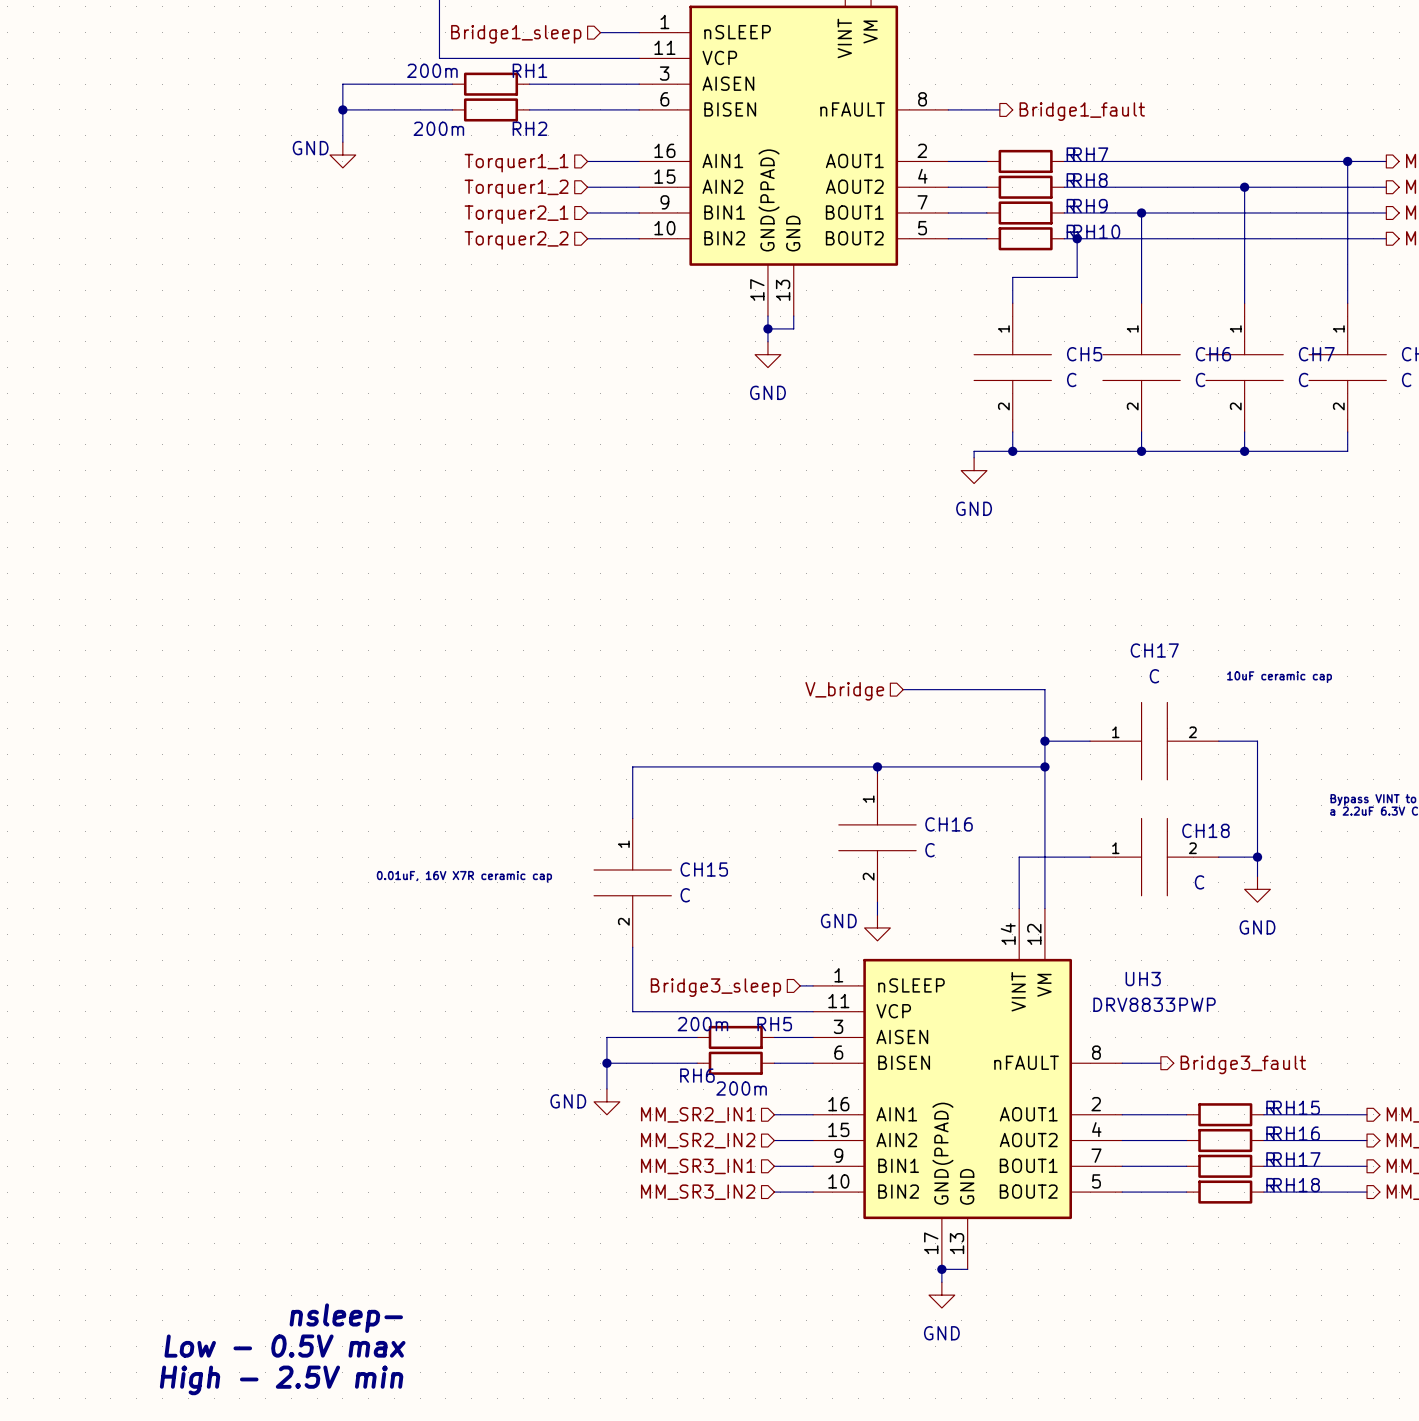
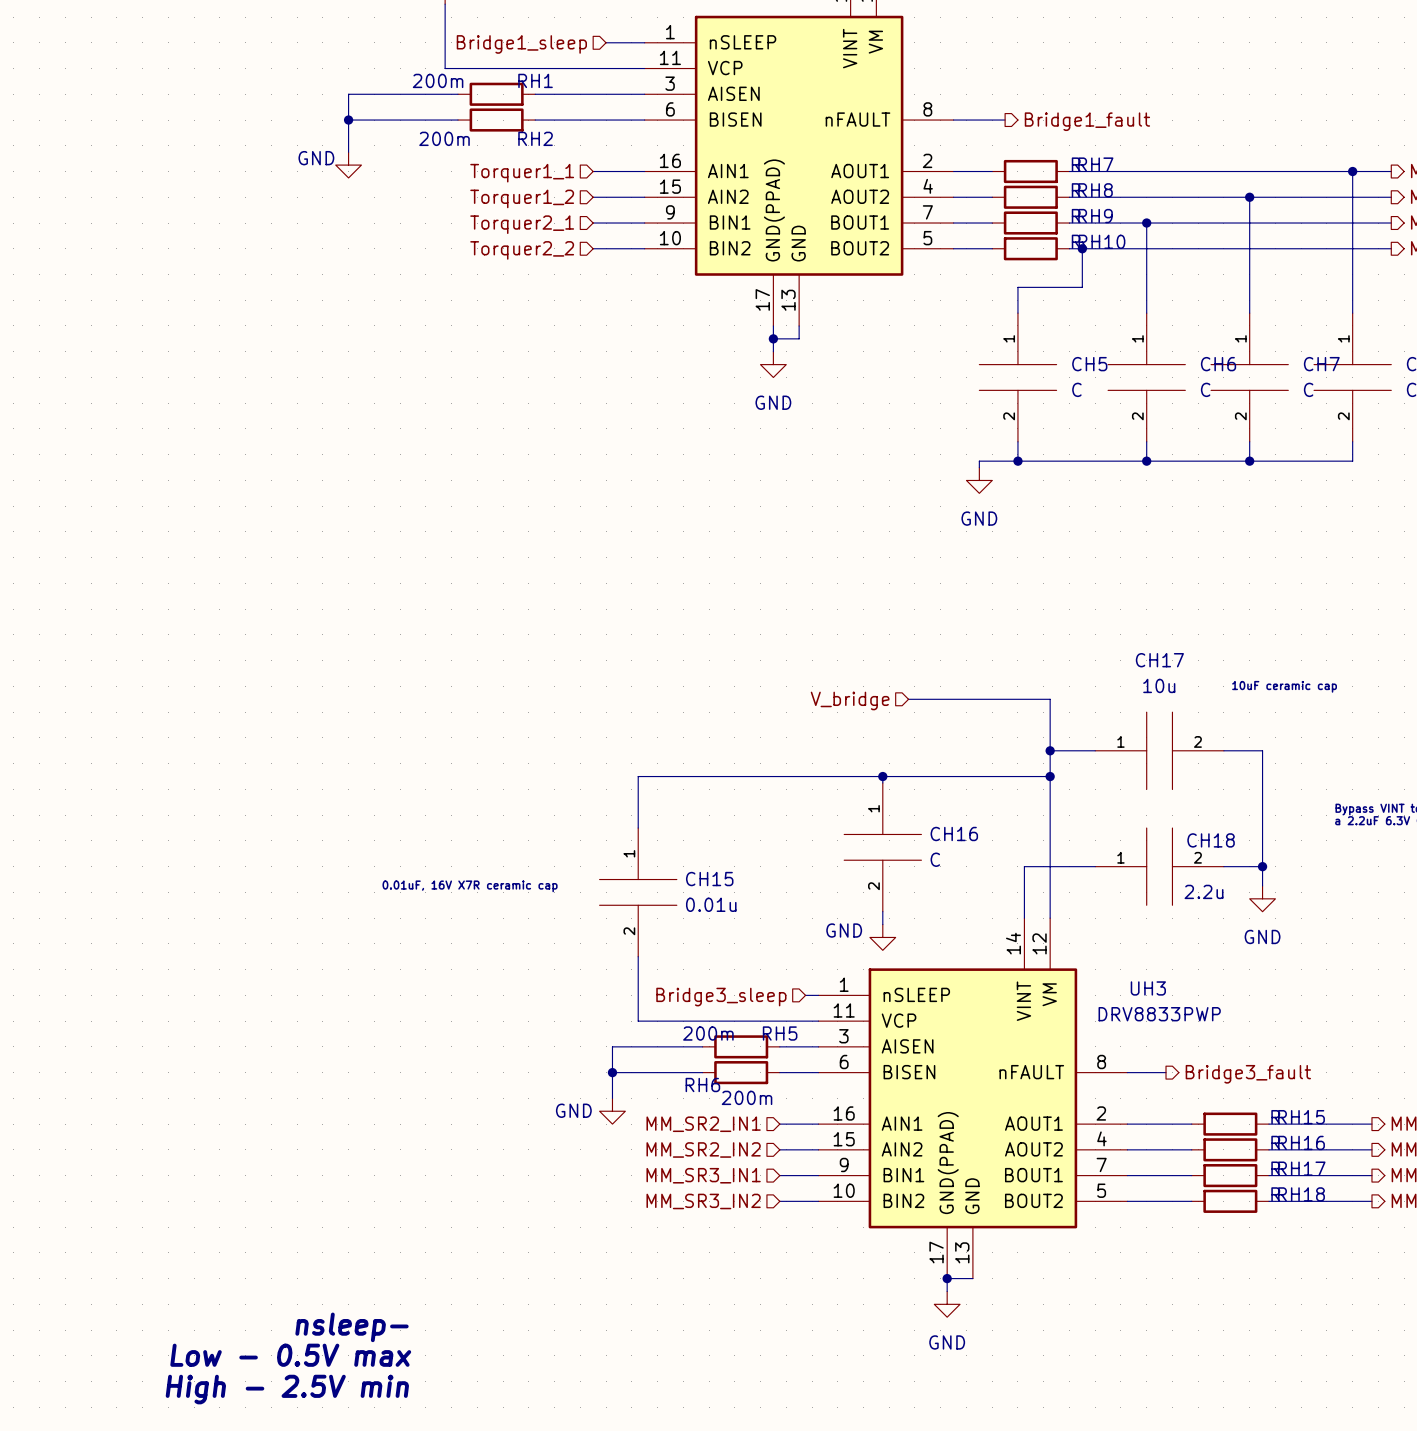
CH17 value: C (1154, 676) -> 10u (1159, 685)
CH18 value: C (1199, 882) -> 2.2u (1204, 891)
CH15 value: C (685, 895) -> 0.01u (711, 904)

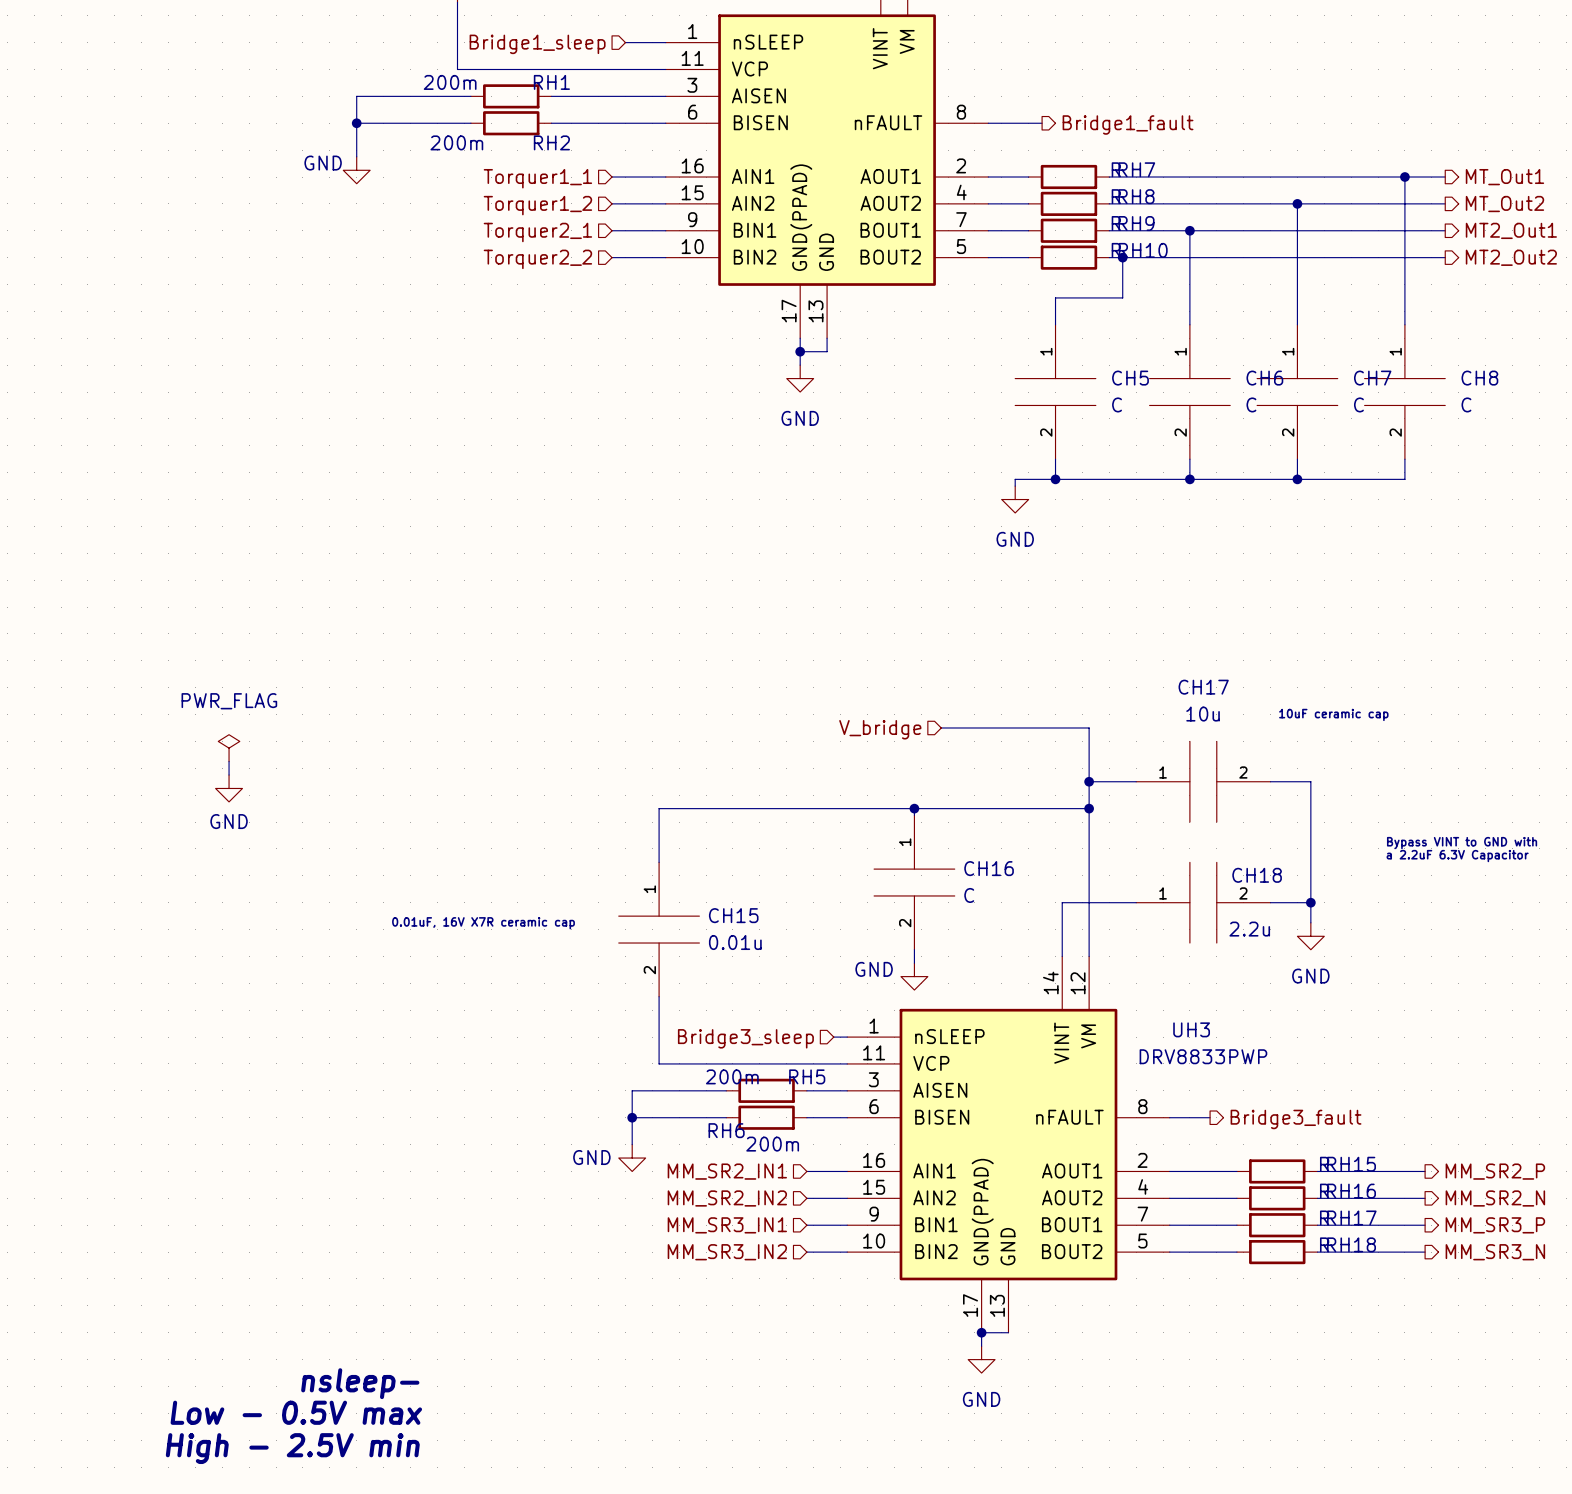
power symbol: none -> PWR_FLAG (229, 748)
wire: none -> (229, 761) (229, 775)
power symbol: none -> GND (229, 788)

